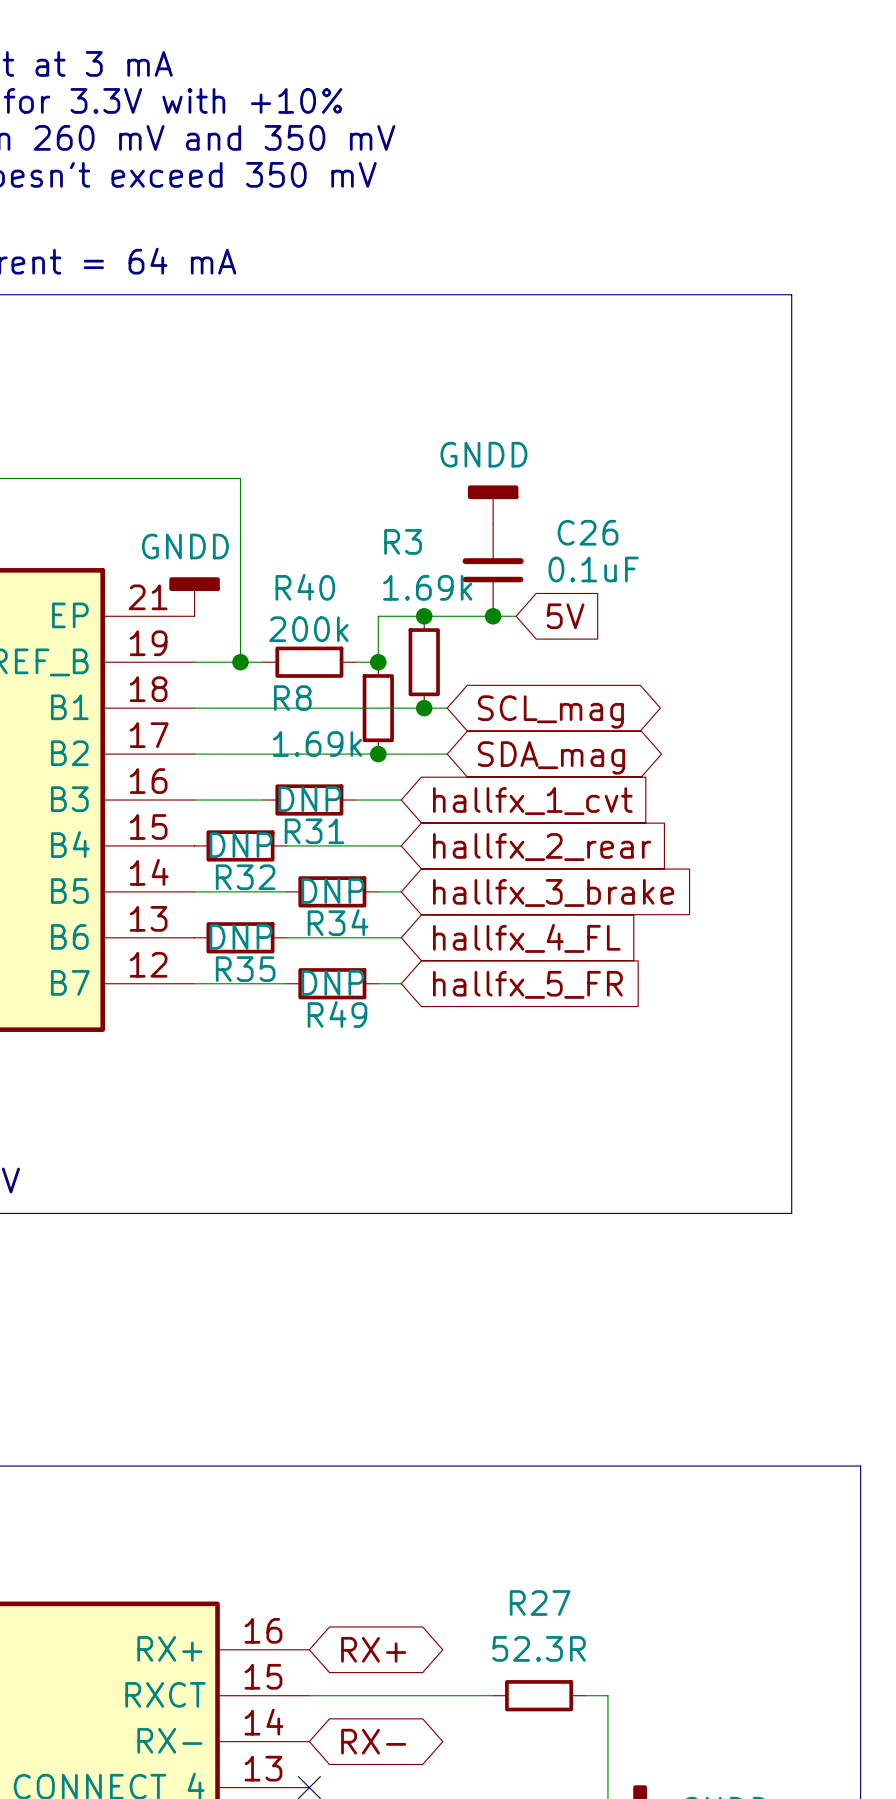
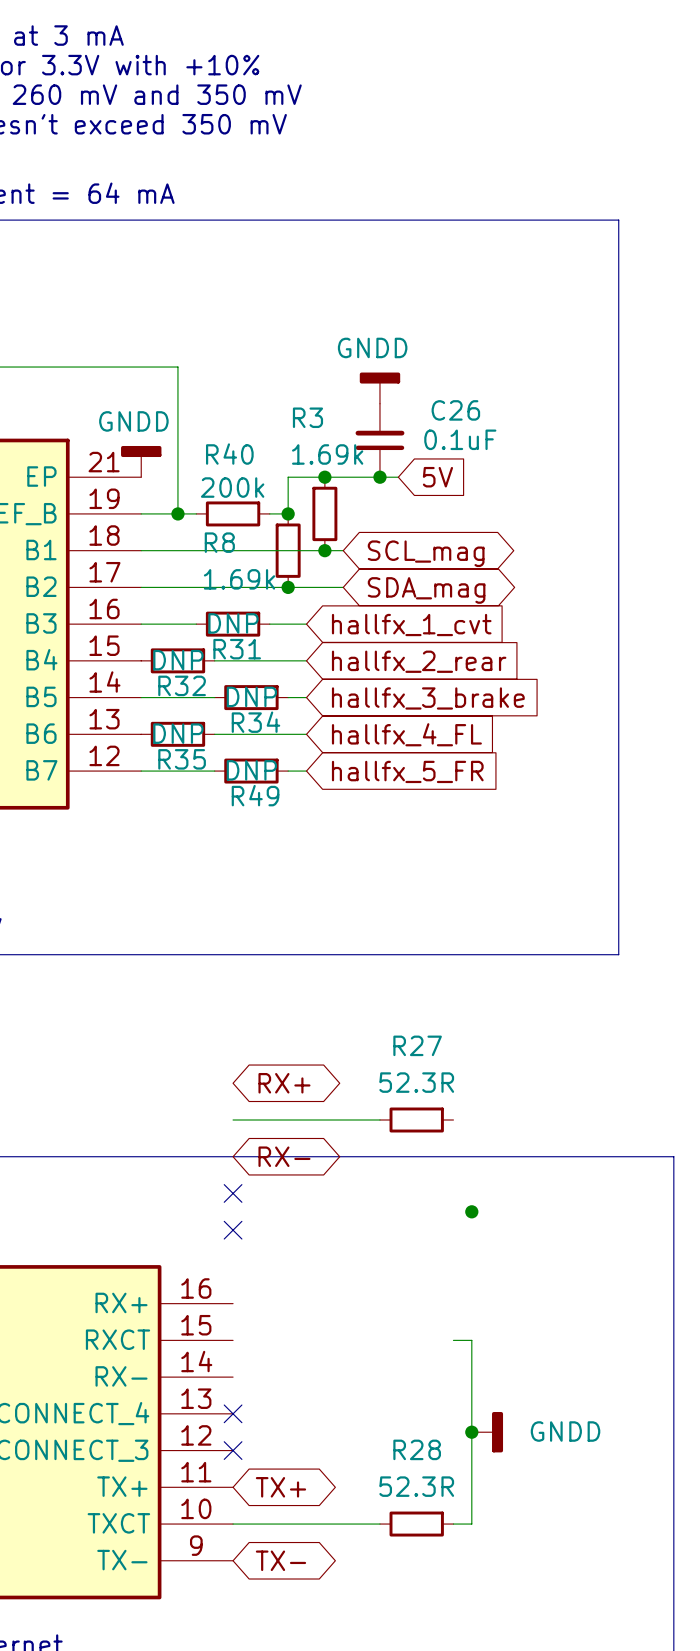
no-connect mark: none -> (233, 1193)
junction: none -> (471, 1211)
no-connect mark: none -> (233, 1230)
global label position: RX+ (373, 1649) -> RX+ (284, 1083)
wire: (309, 1695) (493, 1695) -> (233, 1119) (379, 1119)
R27 position: (539, 1695) -> (416, 1119)
global label position: RX- (373, 1741) -> RX- (284, 1156)

